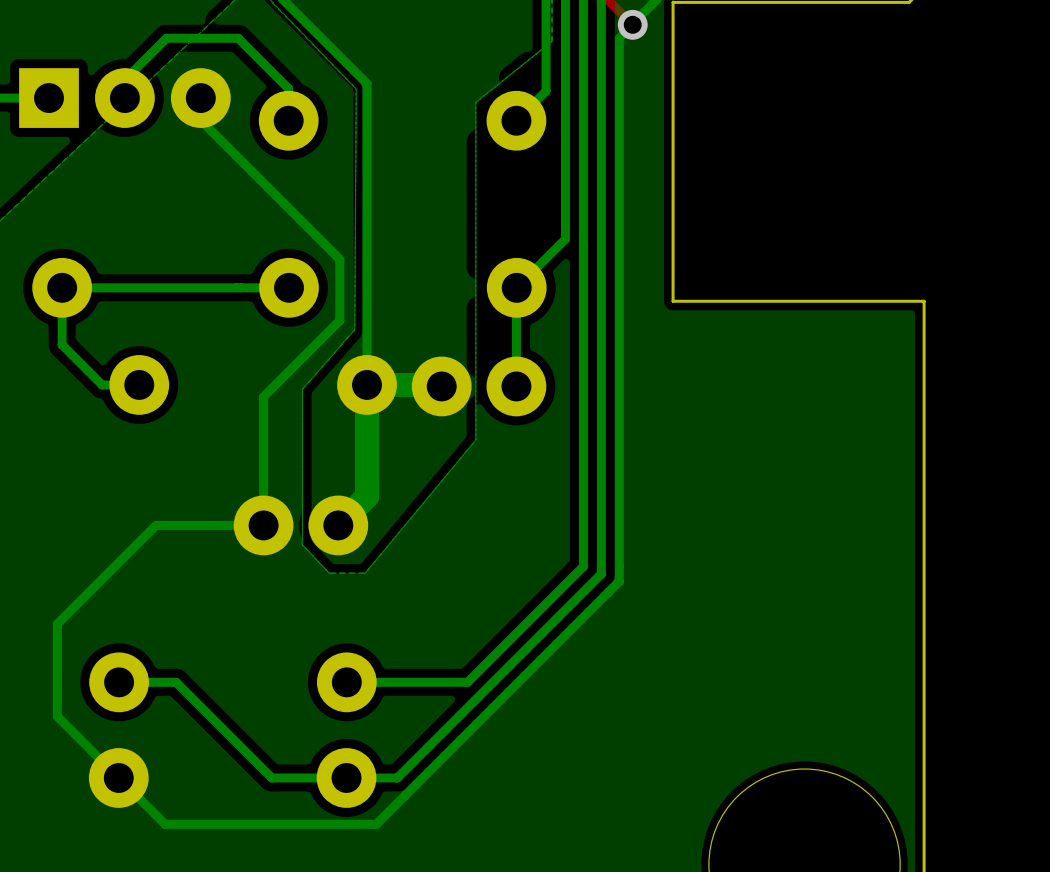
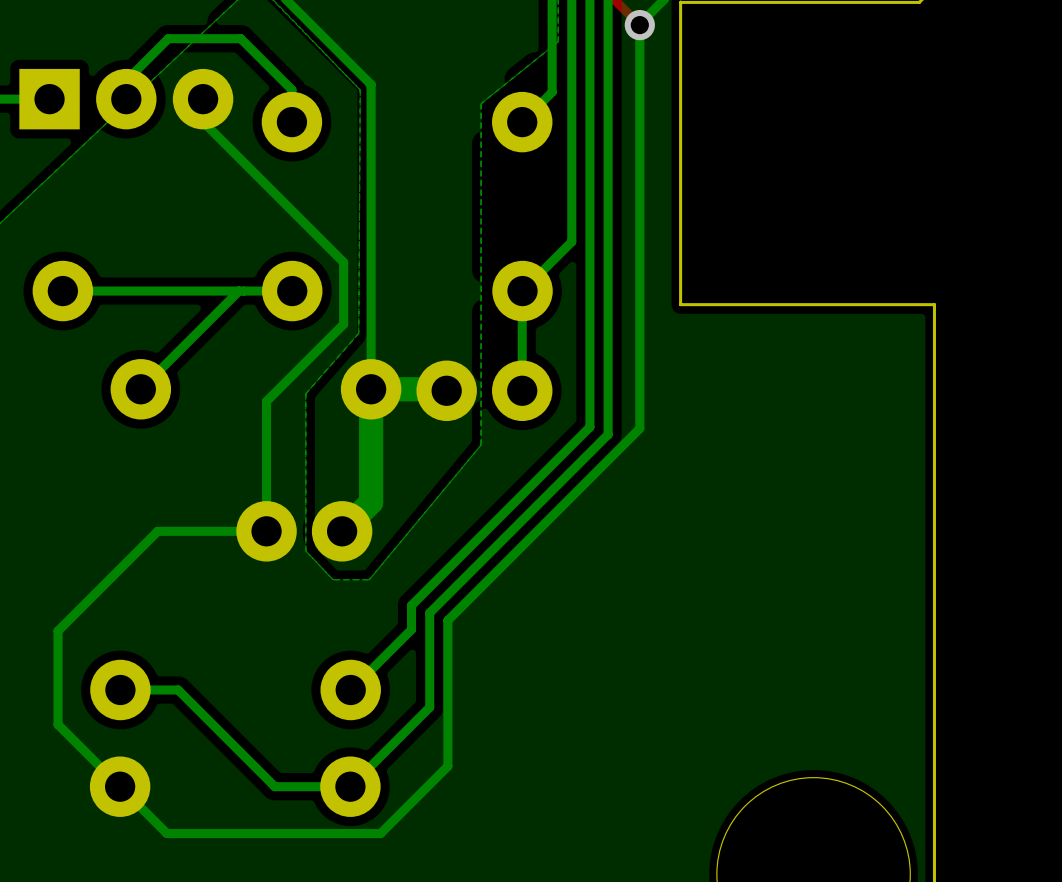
bottom track: (632, 24) (619, 38) (619, 581) (442, 757) -> (639, 25) (639, 428) (447, 620) (447, 766)
bottom track: (62, 287) (62, 344) (102, 384) (139, 384) -> (239, 291) (140, 389)
bottom track: (583, 422) (583, 566) (467, 682) (347, 682) -> (589, 427) (411, 605) (411, 629) (351, 689)
bottom track: (601, 429) (601, 573) (397, 777) (346, 777) -> (608, 434) (429, 612) (429, 707) (350, 786)

